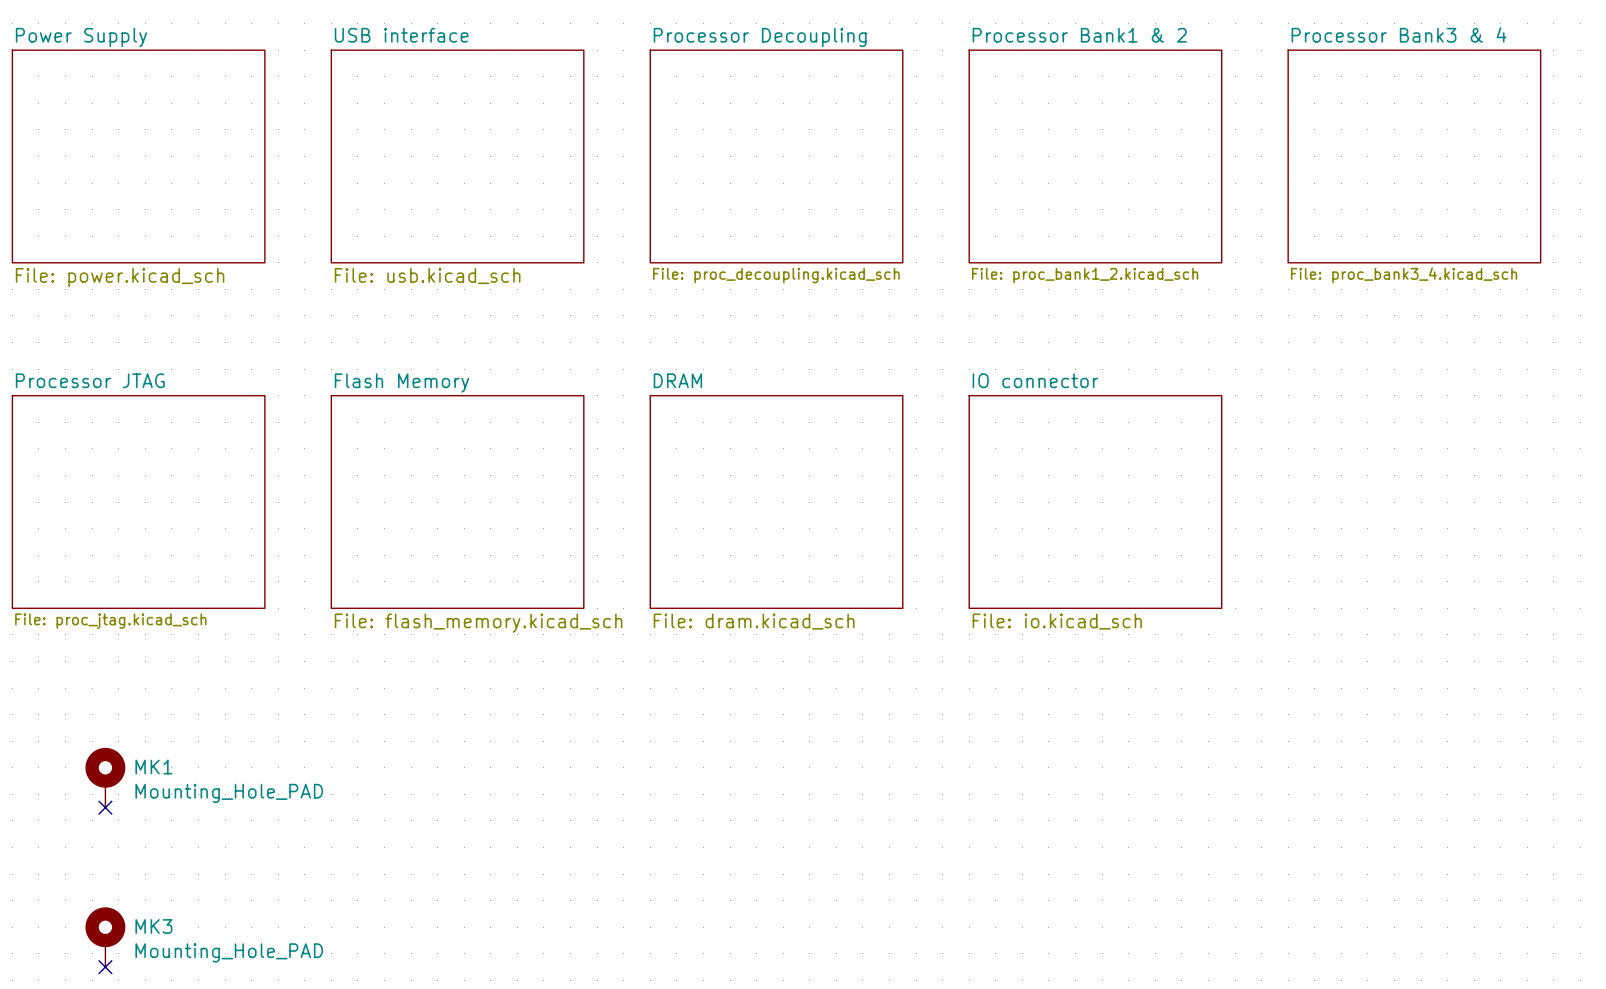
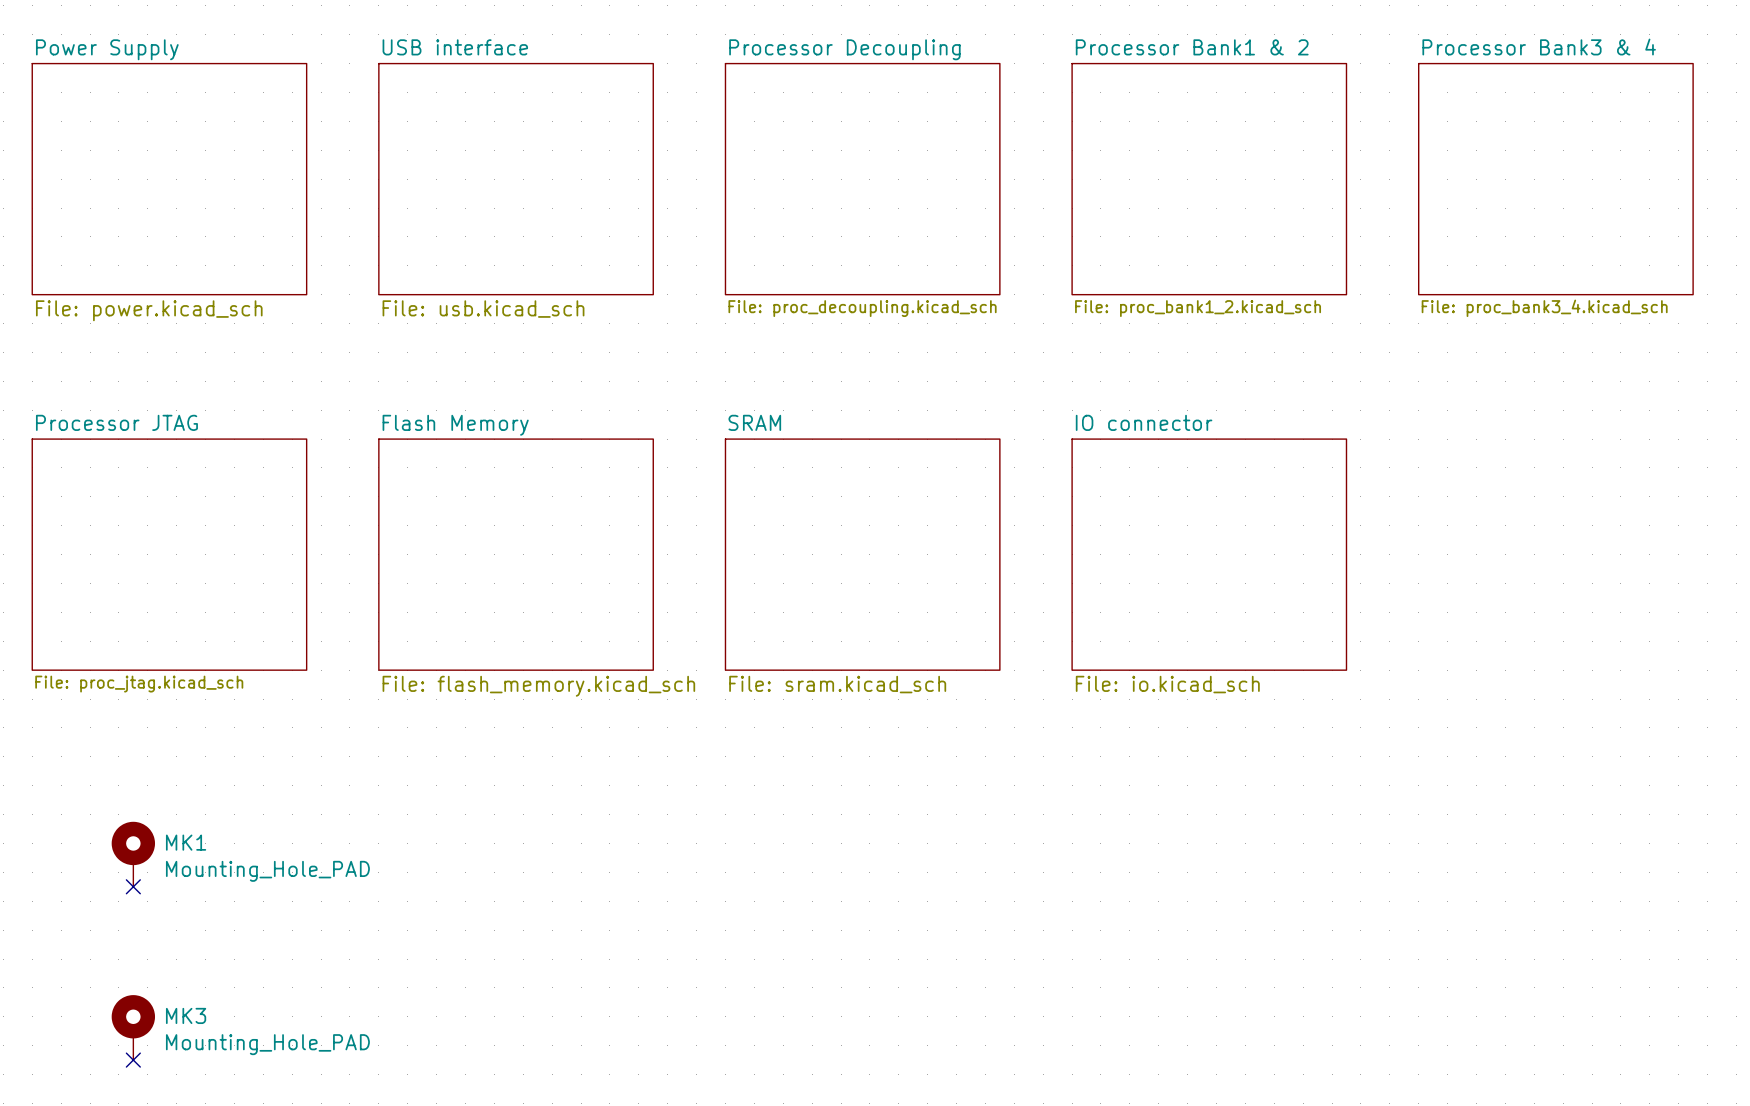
sheet DRAM name: DRAM (677, 380) -> SRAM (754, 422)
sheet DRAM value: File: dram.kicad_sch (754, 621) -> File: sram.kicad_sch (837, 684)

